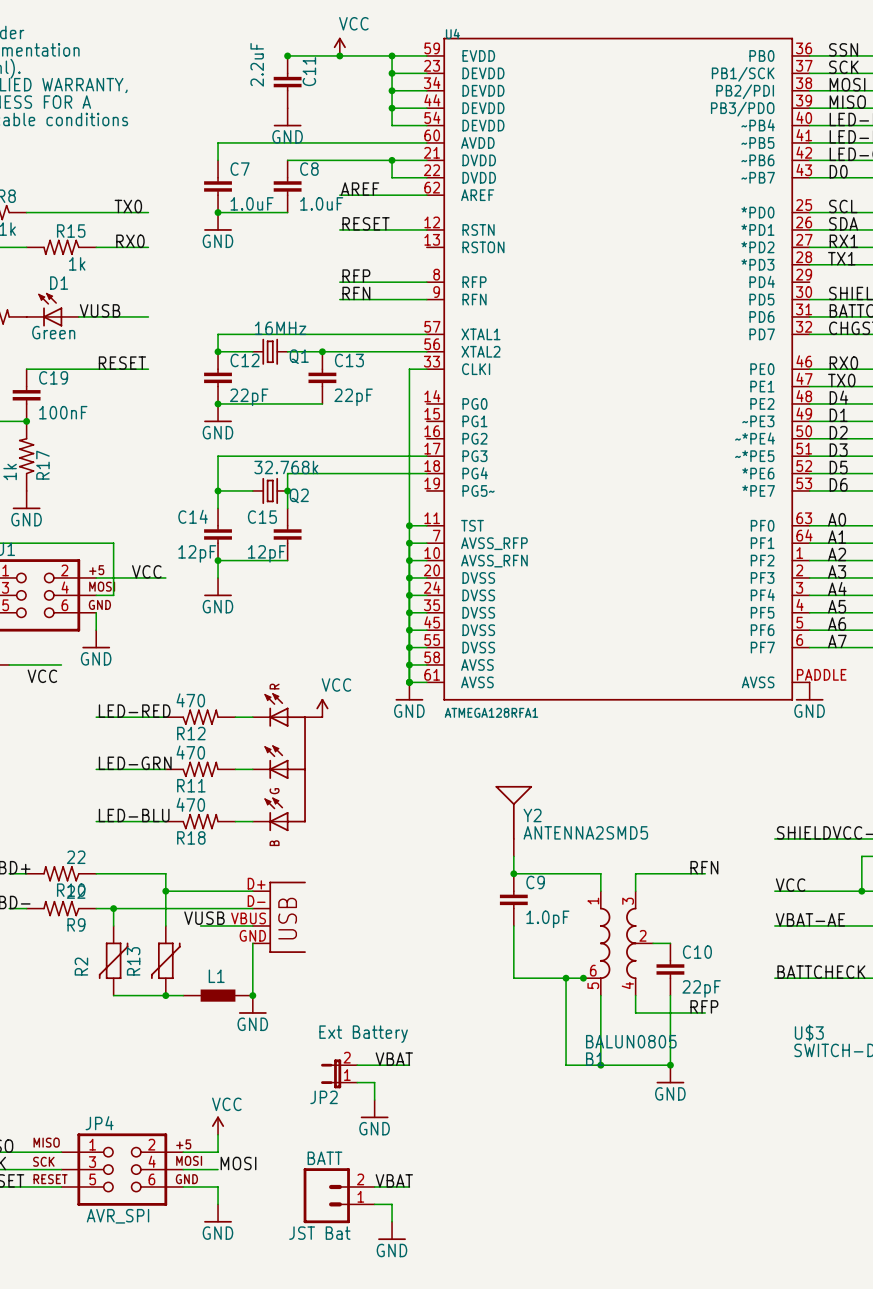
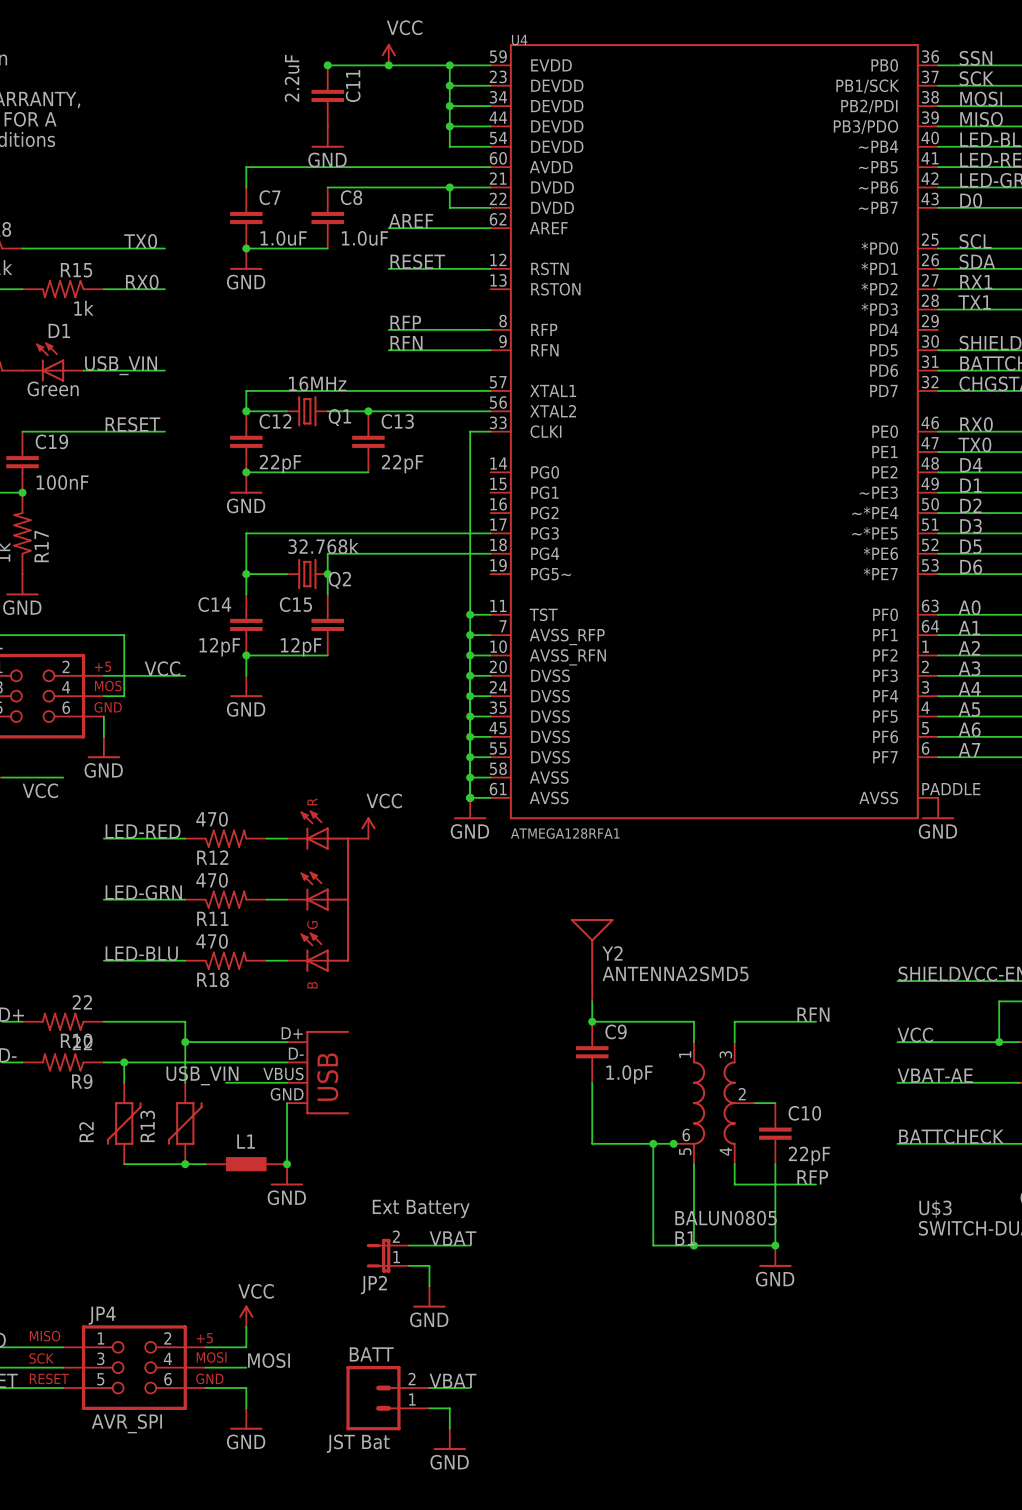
label: VUSB (100, 310) -> USB_VIN (121, 365)
label: none -> USB_VIN (202, 1075)
label: VUSB (204, 918) -> none

